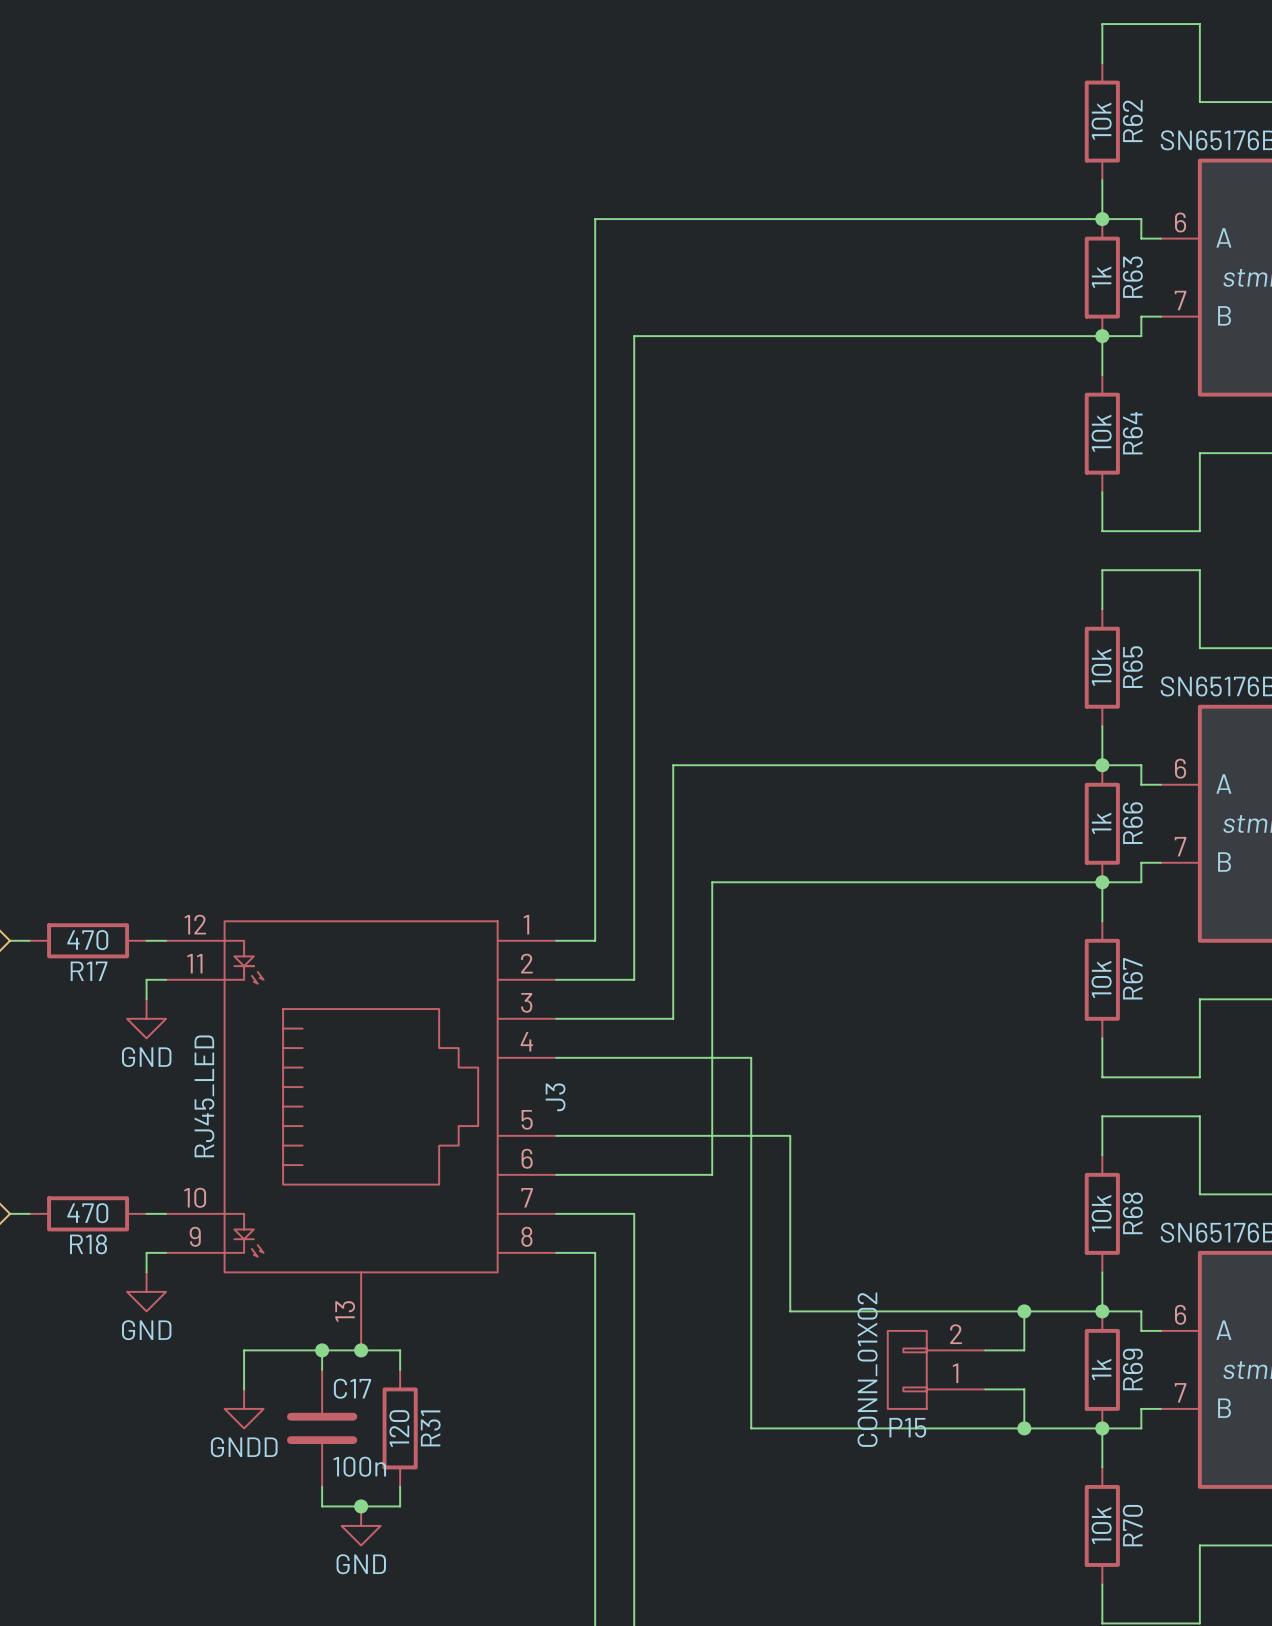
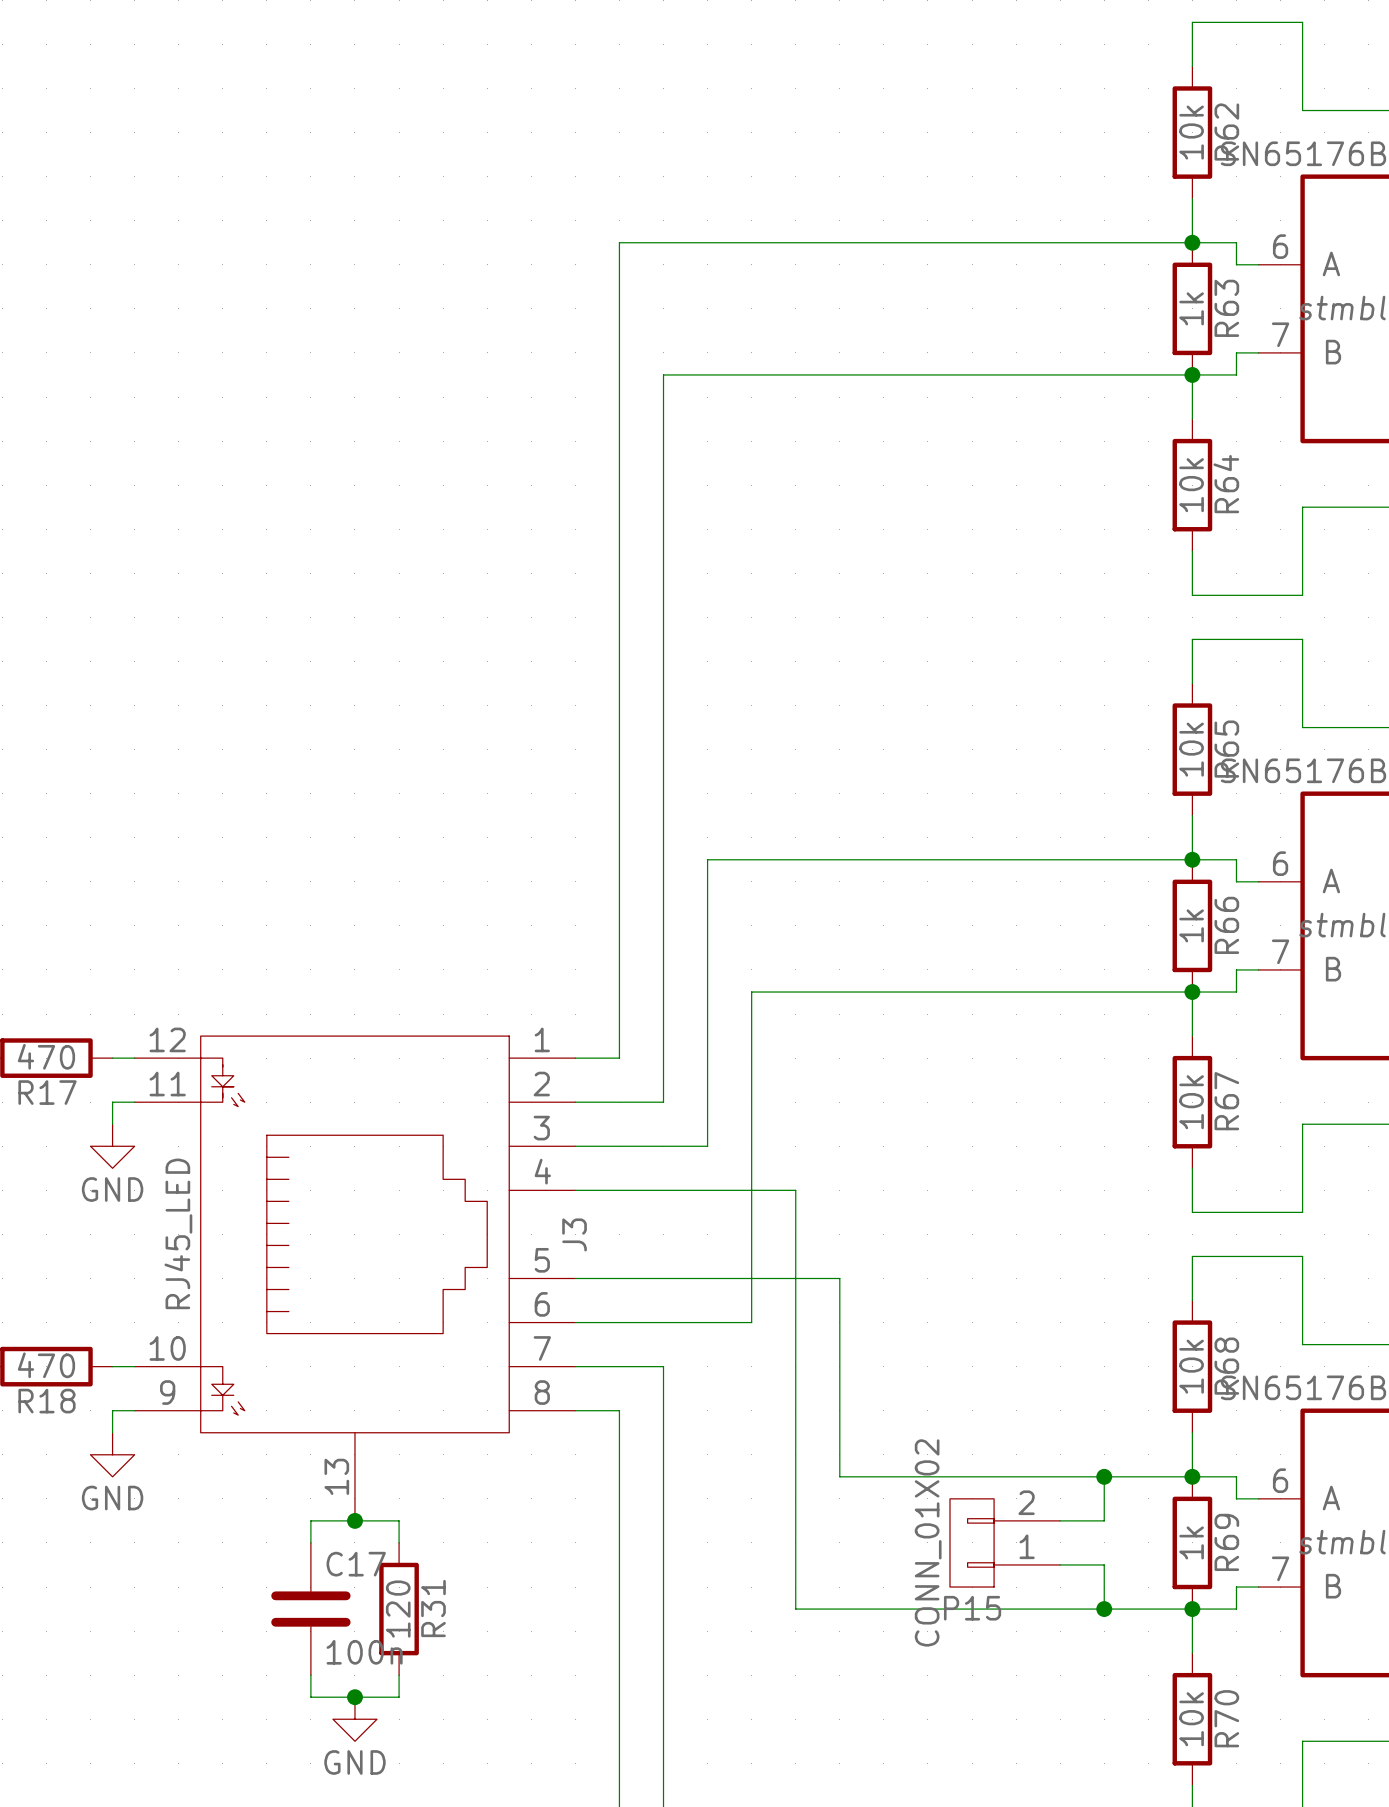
wire: (322, 1350) (244, 1350) (244, 1389) -> none
junction: (322, 1350) -> none
power symbol: GNDD (244, 1408) -> none

